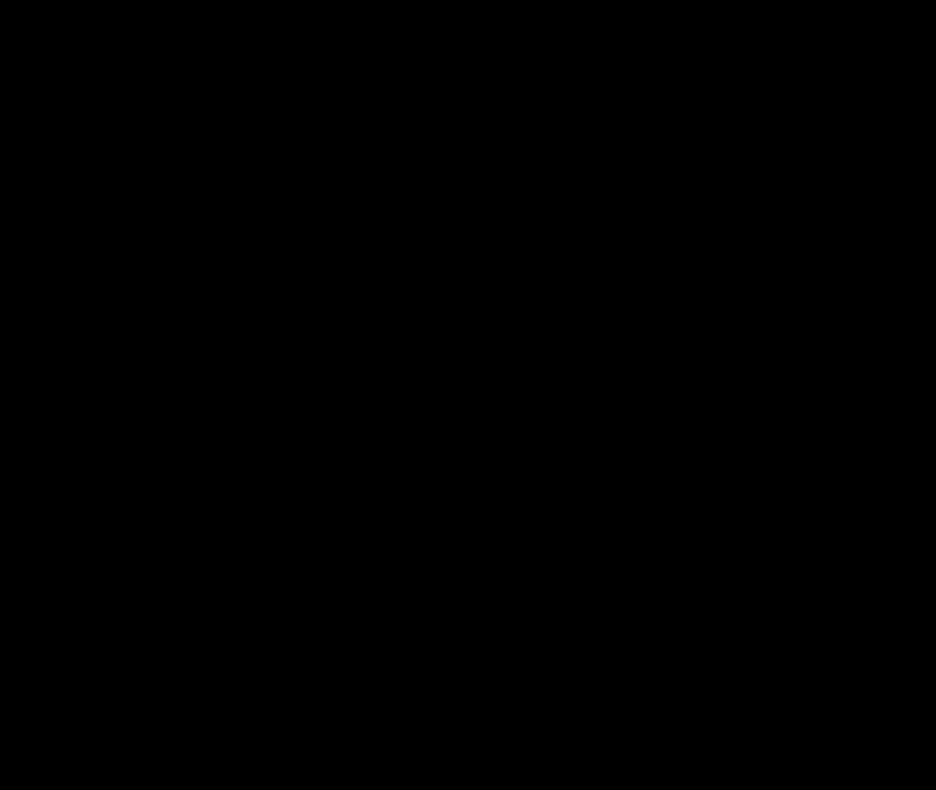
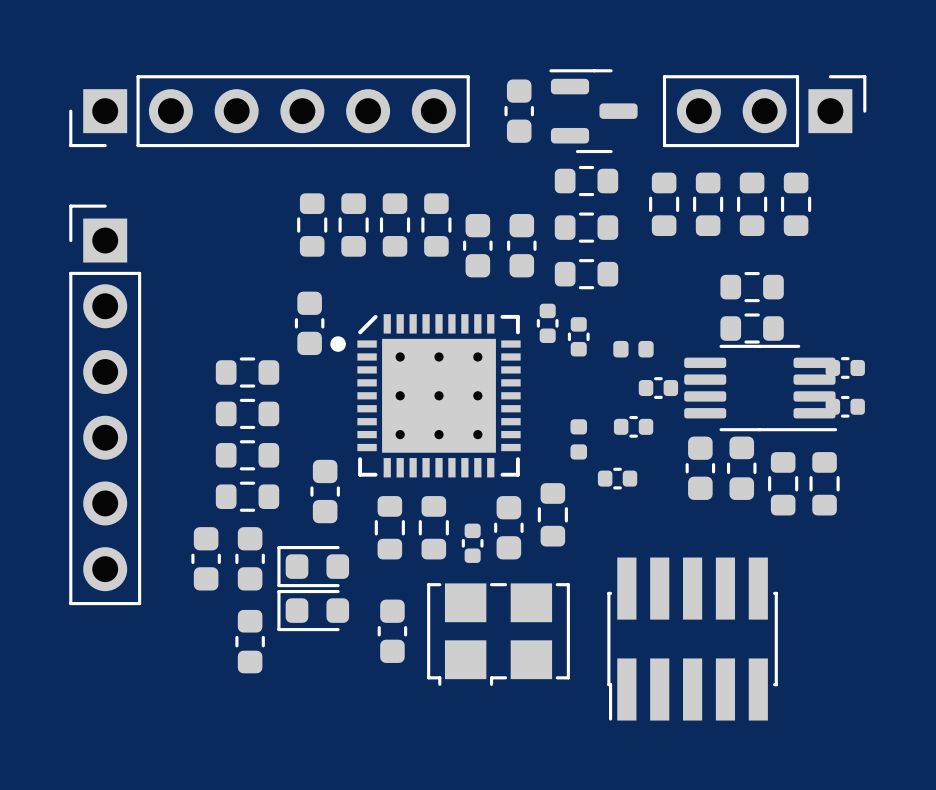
part: none -> (269, 111)
part: none -> (519, 111)
part: none -> (593, 111)
part: none -> (764, 111)
part: none -> (586, 181)
part: none -> (664, 204)
part: none -> (708, 204)
part: none -> (752, 204)
part: none -> (796, 204)
part: none -> (312, 225)
part: none -> (353, 225)
part: none -> (395, 225)
part: none -> (436, 225)
part: none -> (586, 227)
part: none -> (477, 245)
part: none -> (521, 245)
part: none -> (586, 274)
part: none -> (752, 287)
part: none -> (309, 323)
part: none -> (547, 323)
part: none -> (752, 328)
part: none -> (578, 336)
part: none -> (633, 349)
part: none -> (845, 367)
part: none -> (247, 372)
part: none -> (658, 388)
part: none -> (760, 388)
part: none -> (425, 395)
part: none -> (105, 404)
part: none -> (845, 406)
part: none -> (247, 413)
part: none -> (633, 426)
part: none -> (578, 439)
part: none -> (247, 455)
part: none -> (700, 468)
part: none -> (741, 468)
part: none -> (617, 478)
part: none -> (783, 483)
part: none -> (824, 483)
part: none -> (325, 491)
part: none -> (247, 496)
part: none -> (552, 514)
part: none -> (389, 527)
part: none -> (433, 527)
part: none -> (508, 527)
part: none -> (472, 543)
part: none -> (206, 558)
part: none -> (250, 558)
part: none -> (313, 566)
part: none -> (313, 610)
part: none -> (392, 631)
part: none -> (498, 634)
part: none -> (692, 639)
part: none -> (250, 641)

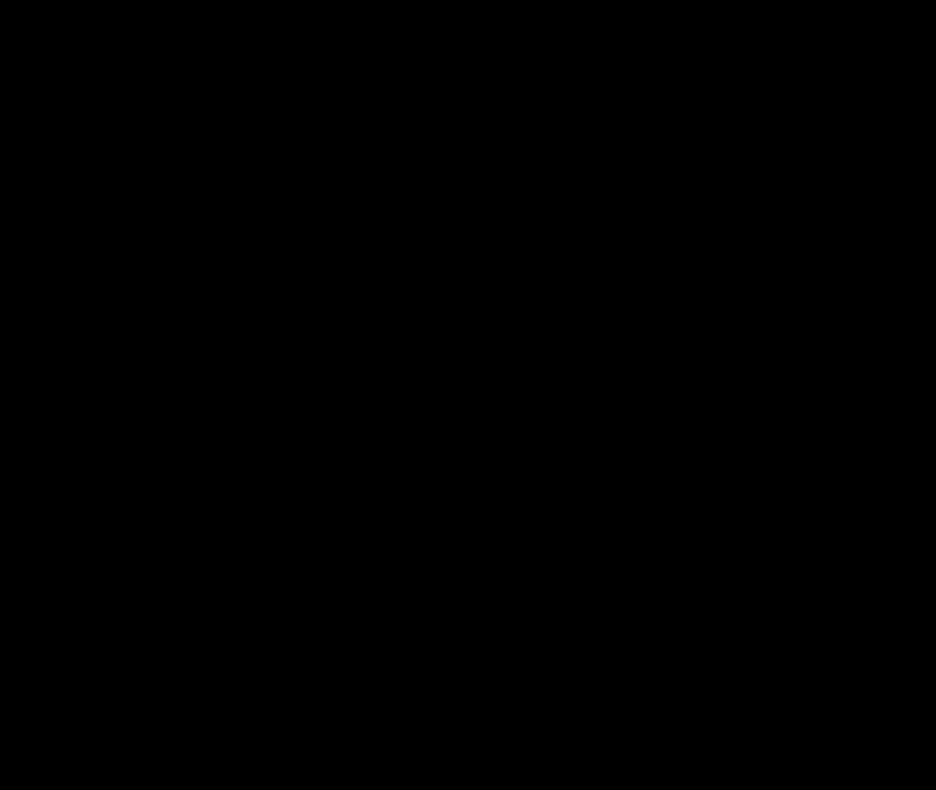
part: (269, 111) -> none
part: (519, 111) -> none
part: (593, 111) -> none
part: (764, 111) -> none
part: (586, 181) -> none
part: (664, 204) -> none
part: (708, 204) -> none
part: (752, 204) -> none
part: (796, 204) -> none
part: (312, 225) -> none
part: (353, 225) -> none
part: (395, 225) -> none
part: (436, 225) -> none
part: (586, 227) -> none
part: (477, 245) -> none
part: (521, 245) -> none
part: (586, 274) -> none
part: (752, 287) -> none
part: (309, 323) -> none
part: (547, 323) -> none
part: (752, 328) -> none
part: (578, 336) -> none
part: (633, 349) -> none
part: (845, 367) -> none
part: (247, 372) -> none
part: (658, 388) -> none
part: (760, 388) -> none
part: (425, 395) -> none
part: (105, 404) -> none
part: (845, 406) -> none
part: (247, 413) -> none
part: (633, 426) -> none
part: (578, 439) -> none
part: (247, 455) -> none
part: (700, 468) -> none
part: (741, 468) -> none
part: (617, 478) -> none
part: (783, 483) -> none
part: (824, 483) -> none
part: (325, 491) -> none
part: (247, 496) -> none
part: (552, 514) -> none
part: (389, 527) -> none
part: (433, 527) -> none
part: (508, 527) -> none
part: (472, 543) -> none
part: (206, 558) -> none
part: (250, 558) -> none
part: (313, 566) -> none
part: (313, 610) -> none
part: (392, 631) -> none
part: (498, 634) -> none
part: (692, 639) -> none
part: (250, 641) -> none

